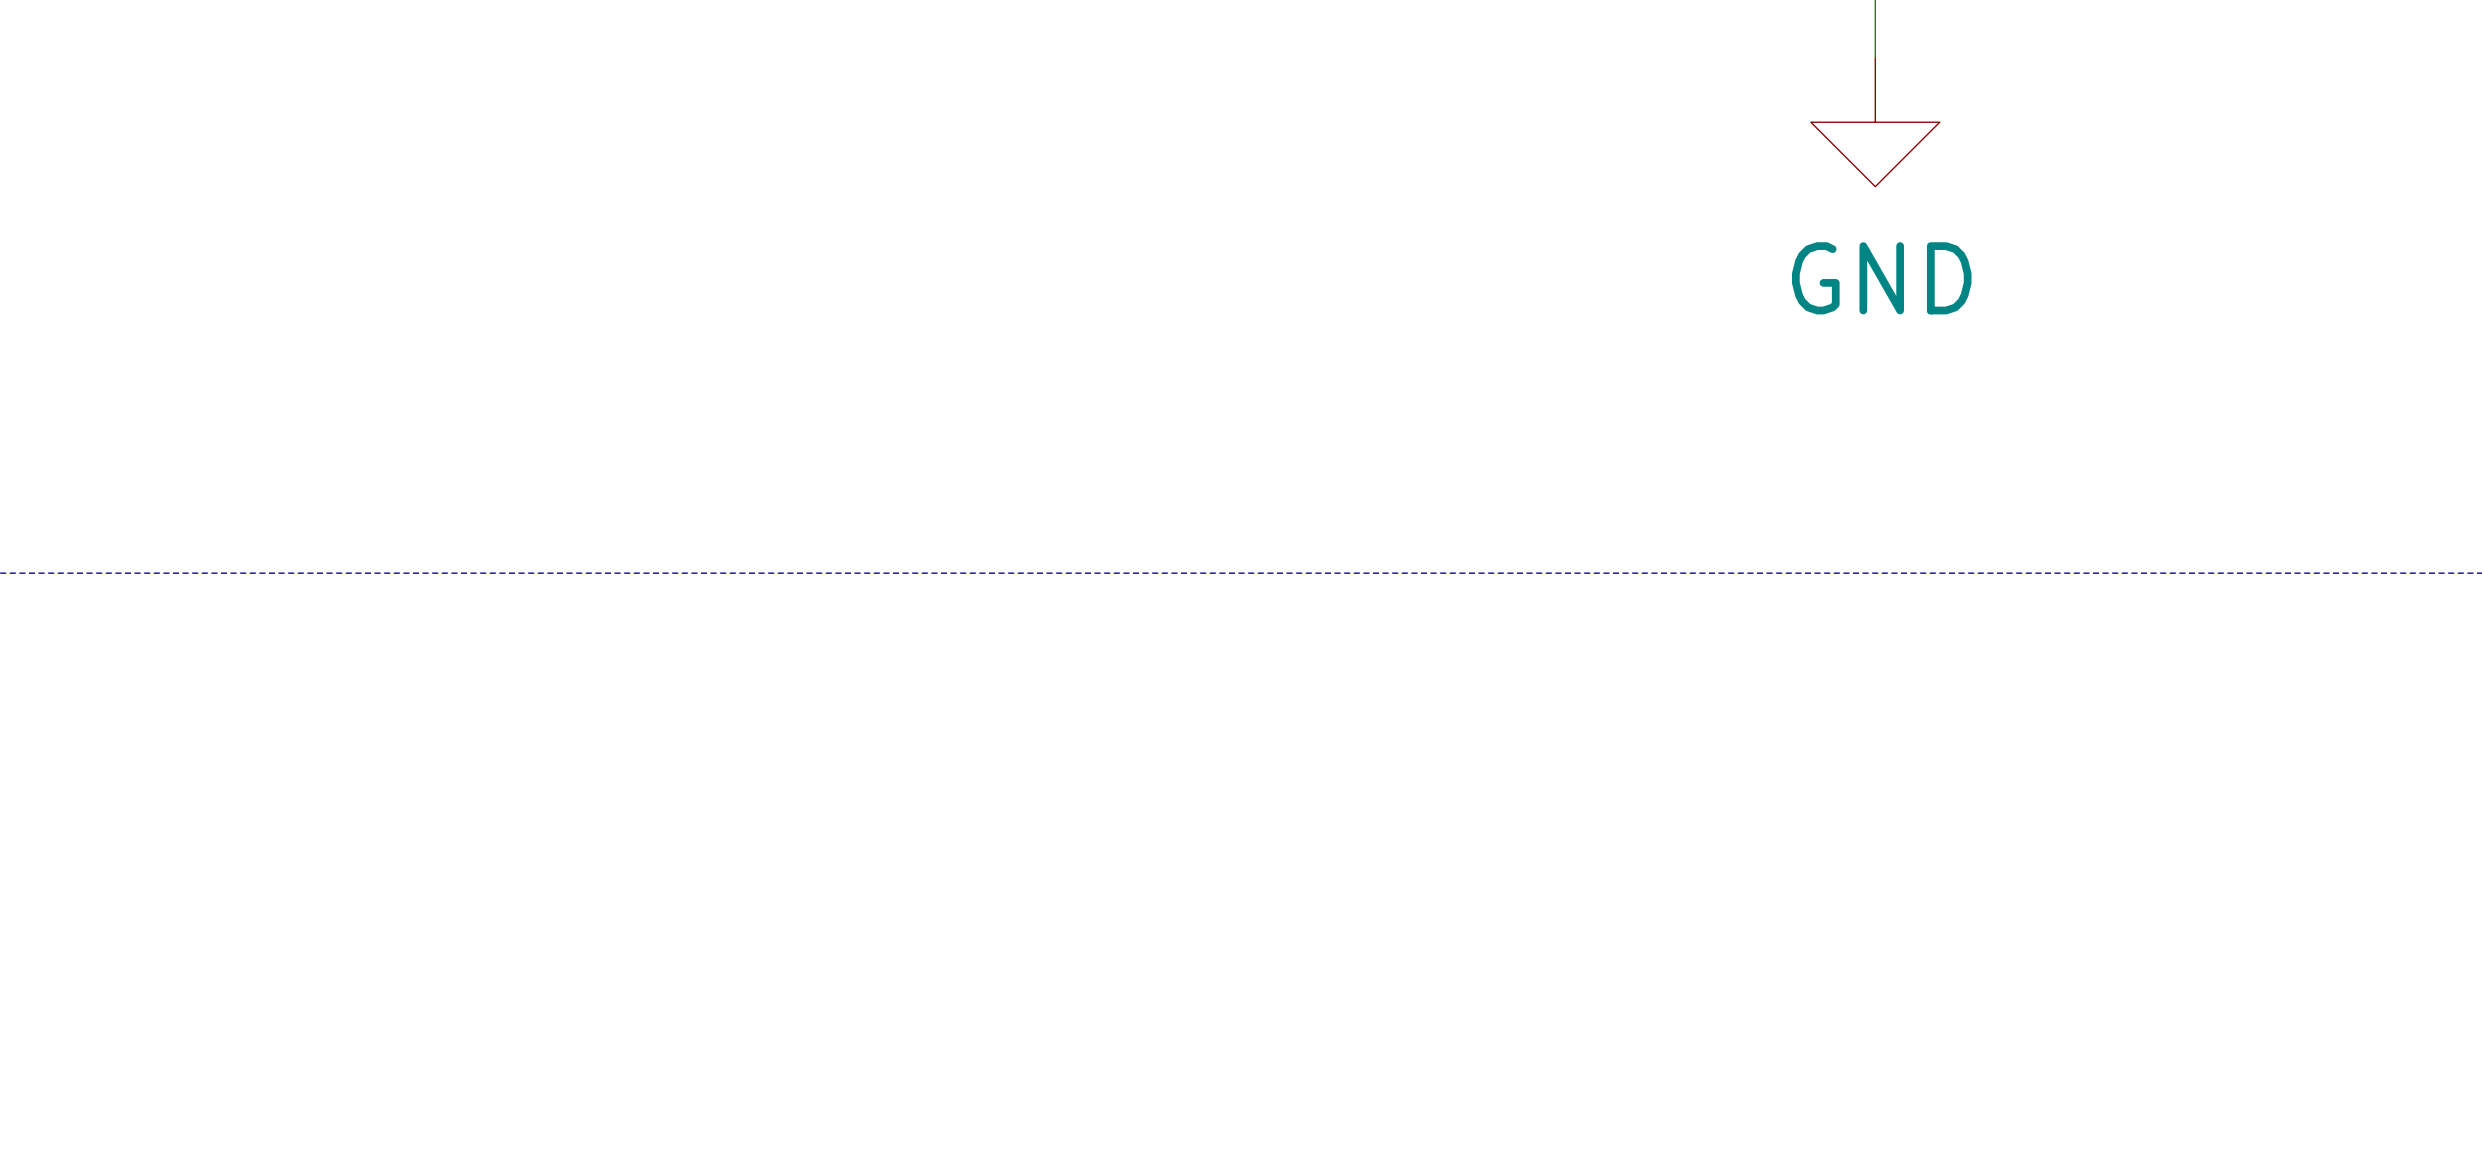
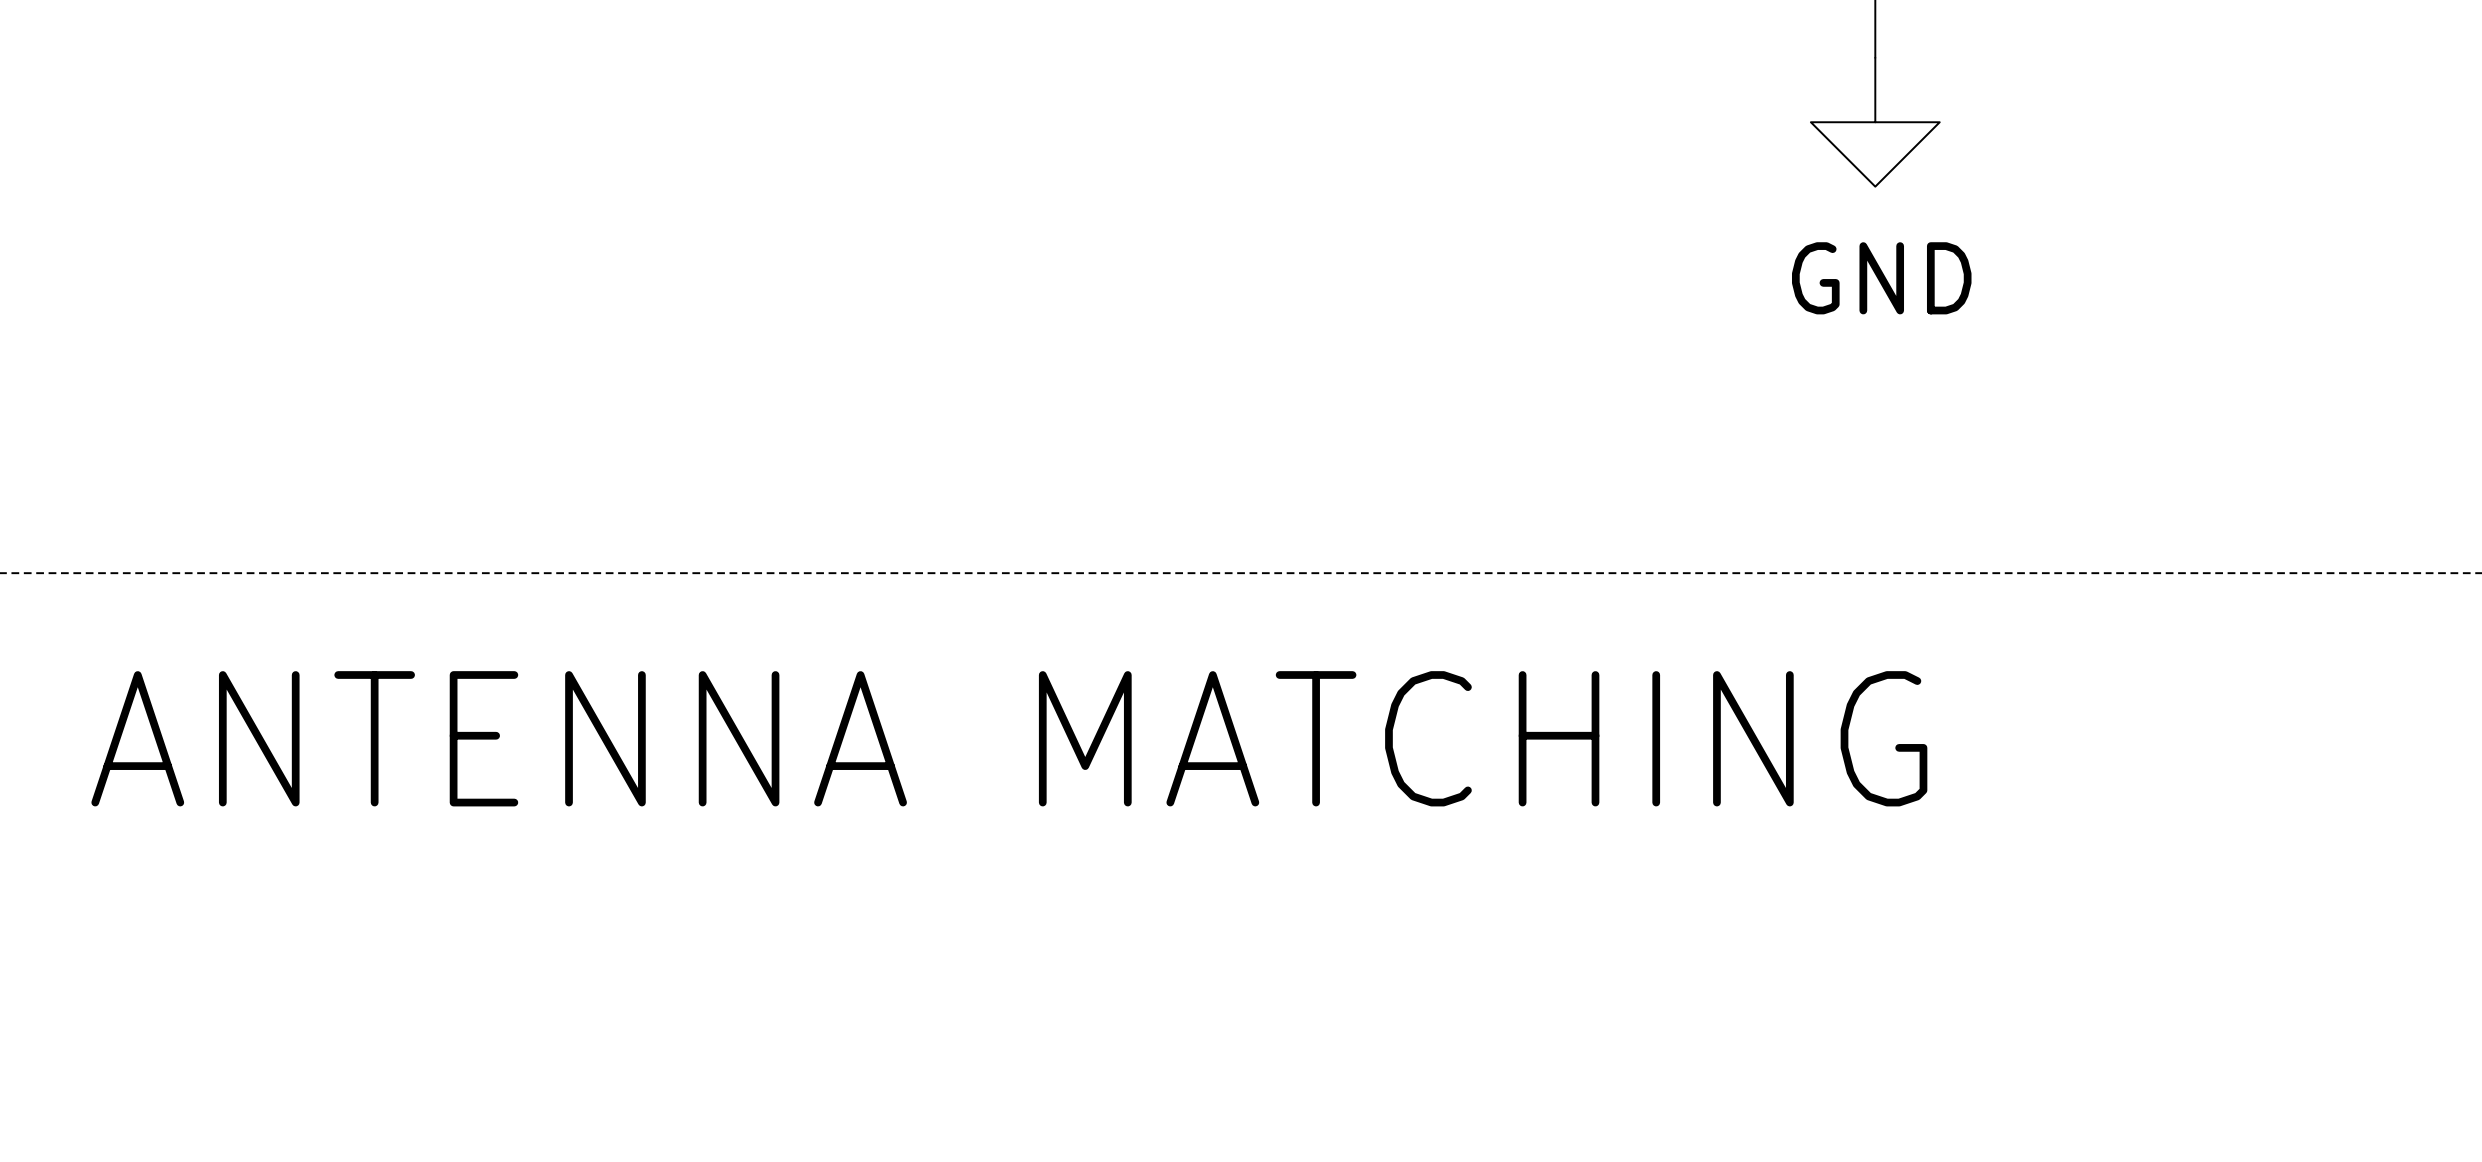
text: none -> ANTENNA MATCHING (1009, 738)

